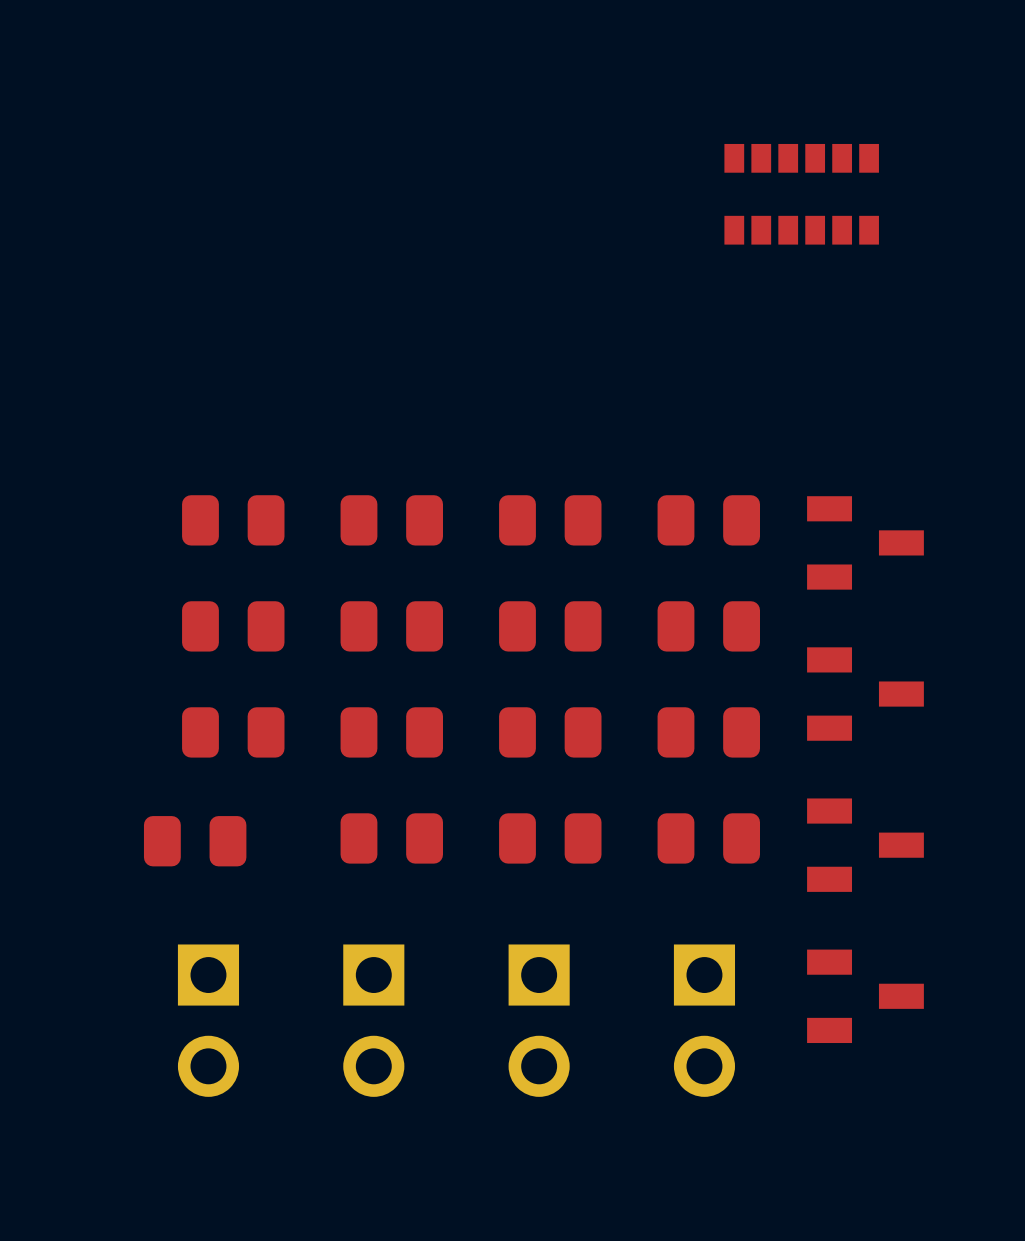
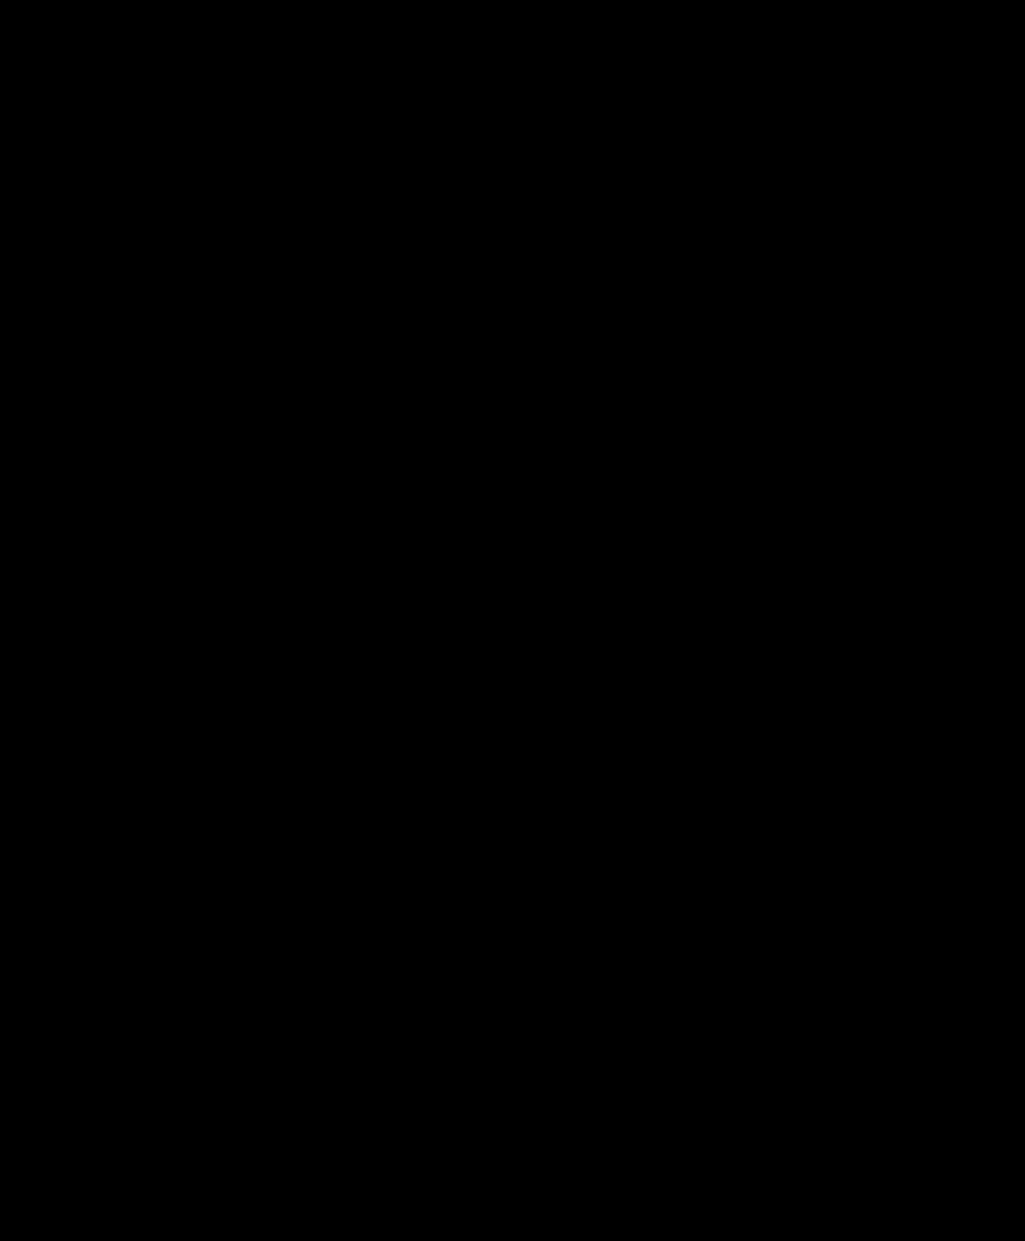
part: (801, 194) -> none
part: (233, 520) -> none
part: (391, 520) -> none
part: (550, 520) -> none
part: (708, 520) -> none
part: (865, 542) -> none
part: (233, 626) -> none
part: (391, 626) -> none
part: (550, 626) -> none
part: (708, 626) -> none
part: (865, 694) -> none
part: (233, 732) -> none
part: (391, 732) -> none
part: (550, 732) -> none
part: (708, 732) -> none
part: (391, 838) -> none
part: (550, 838) -> none
part: (708, 838) -> none
part: (195, 841) -> none
part: (865, 845) -> none
part: (865, 996) -> none
part: (208, 1020) -> none
part: (373, 1020) -> none
part: (539, 1020) -> none
part: (704, 1020) -> none

